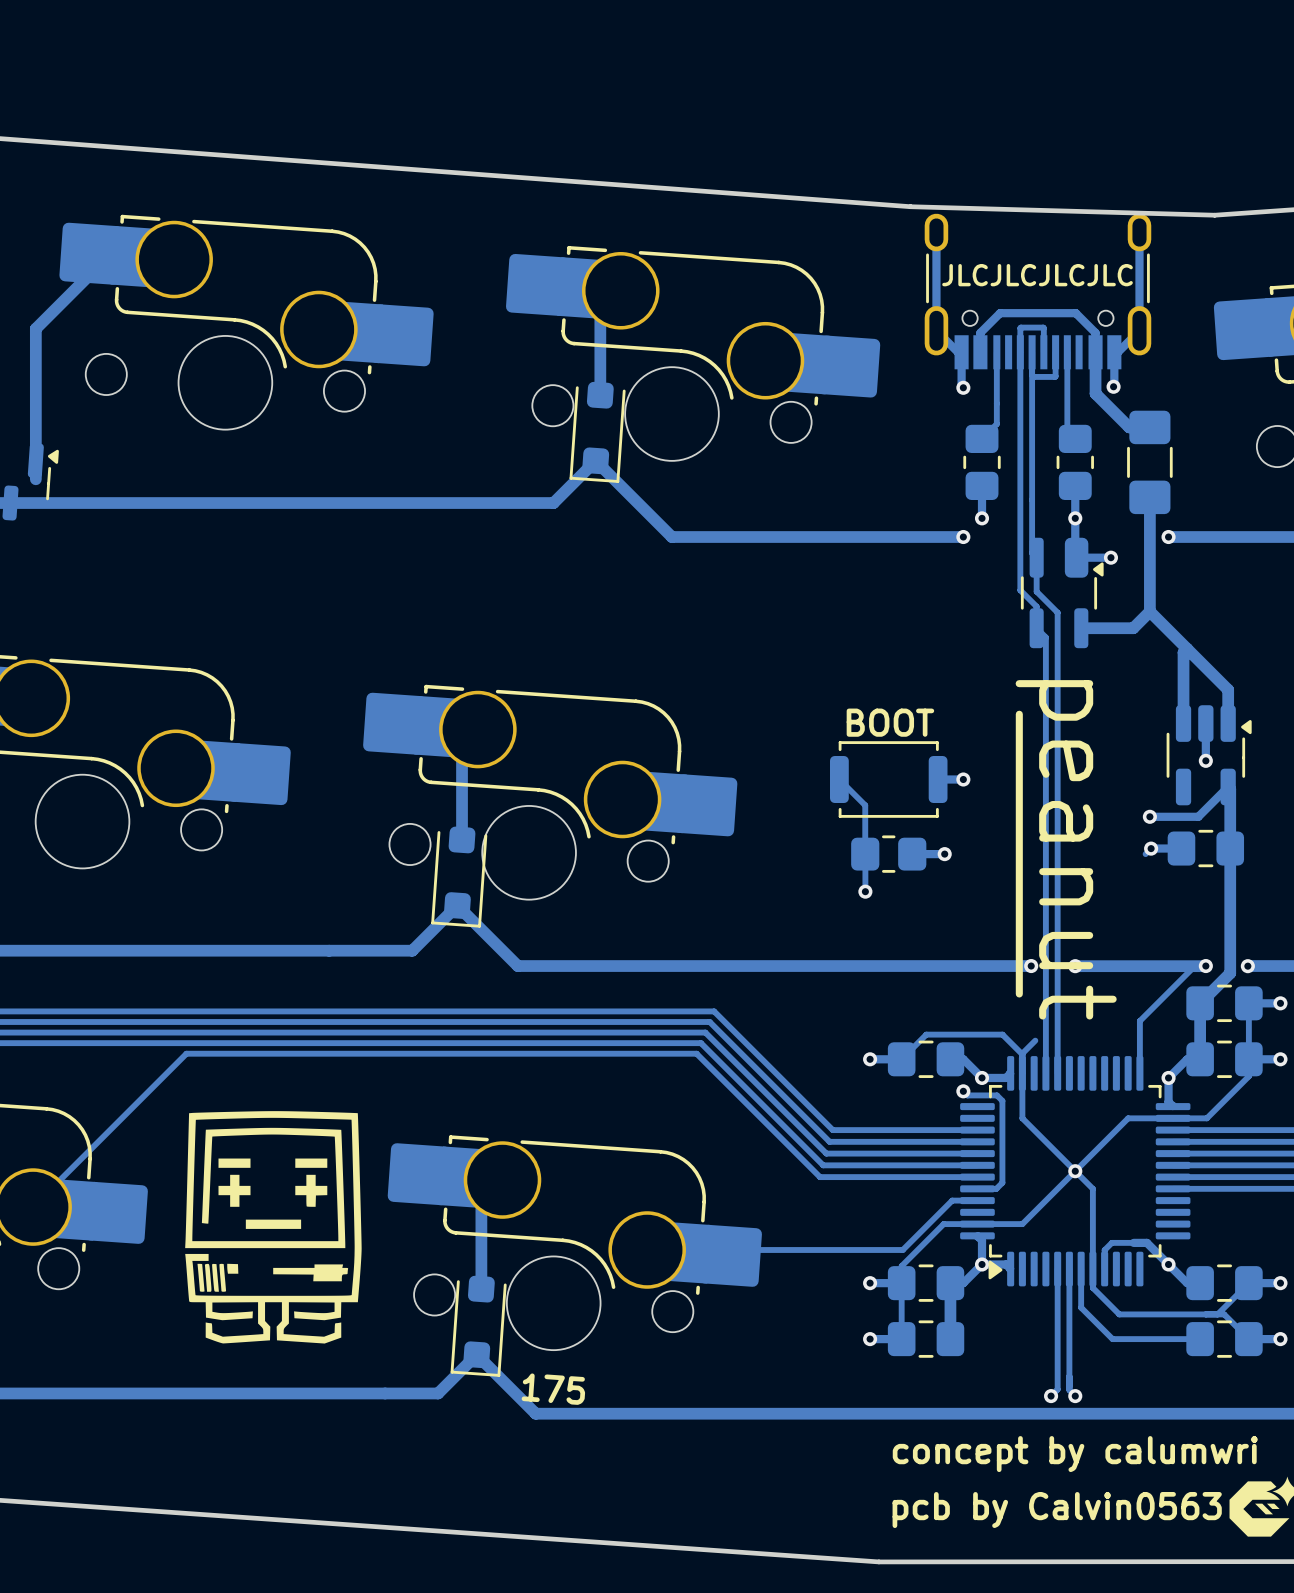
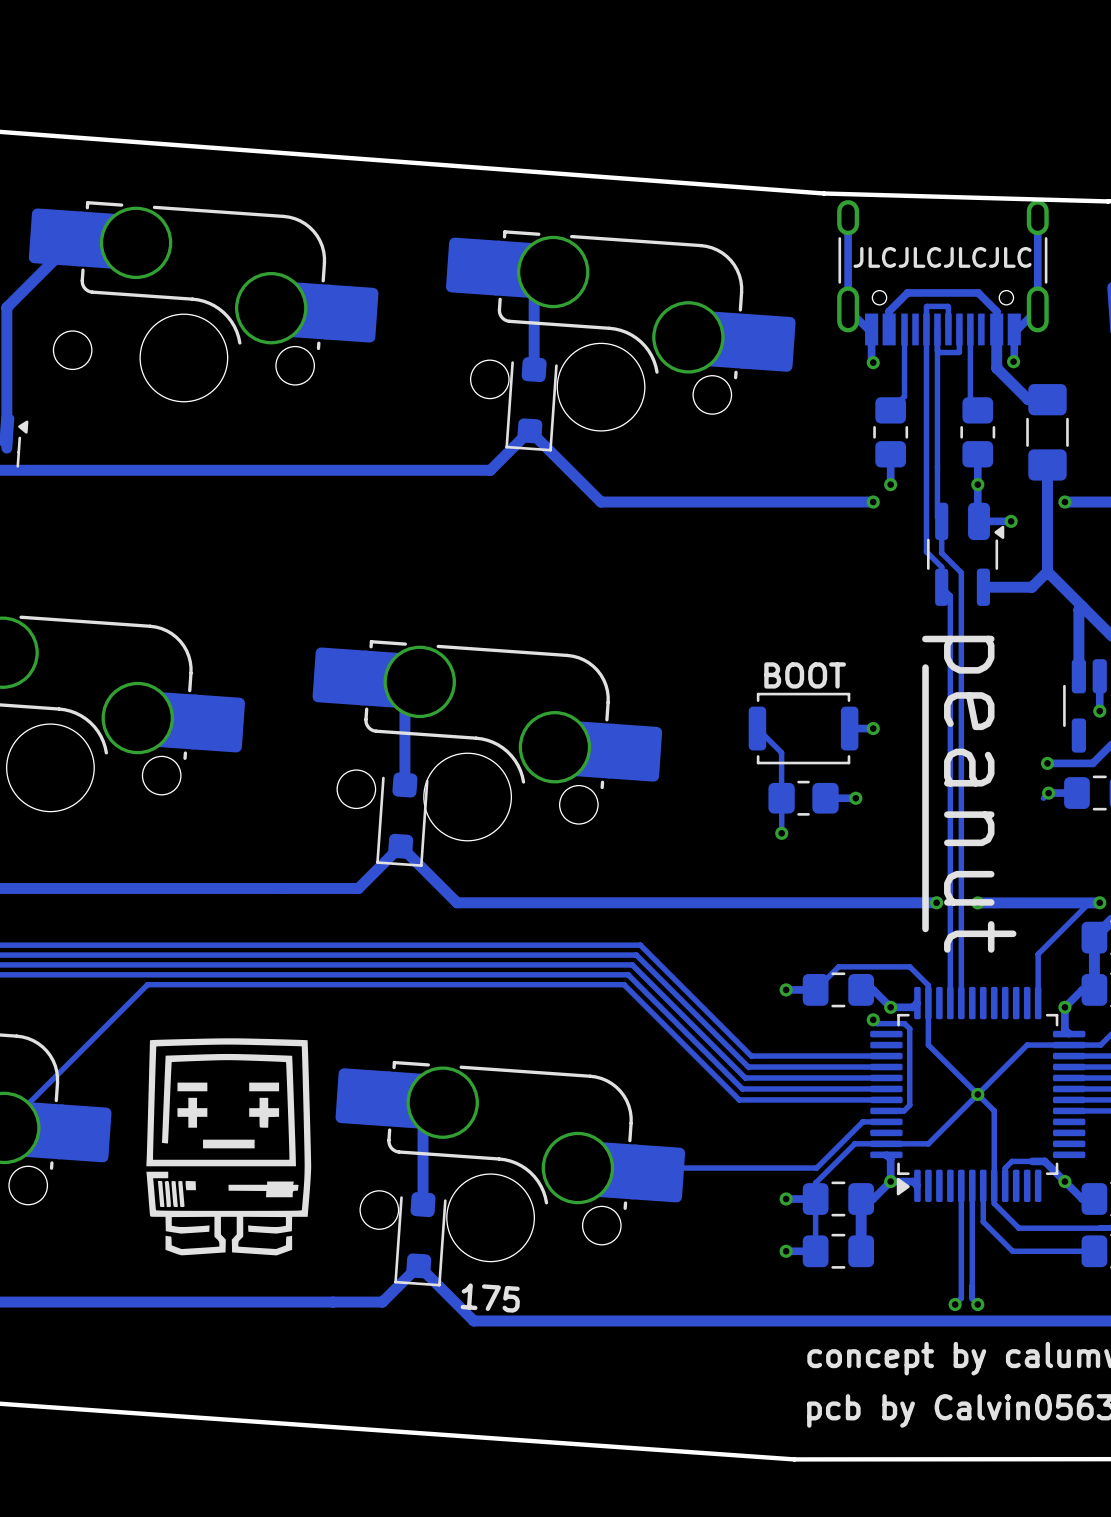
track: (1035, 1040) (1022, 1054) -> none

